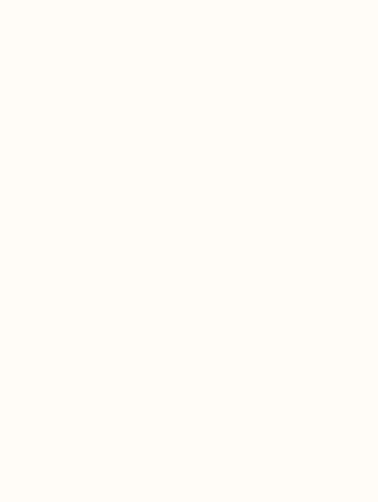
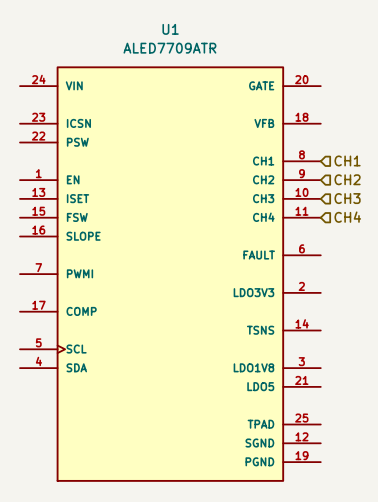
hierarchical label: none -> CH1 (347, 160)
hierarchical label: none -> CH2 (347, 179)
hierarchical label: none -> CH3 (347, 198)
hierarchical label: none -> CH4 (347, 217)
U1: none -> ALED7709ATR (170, 274)

